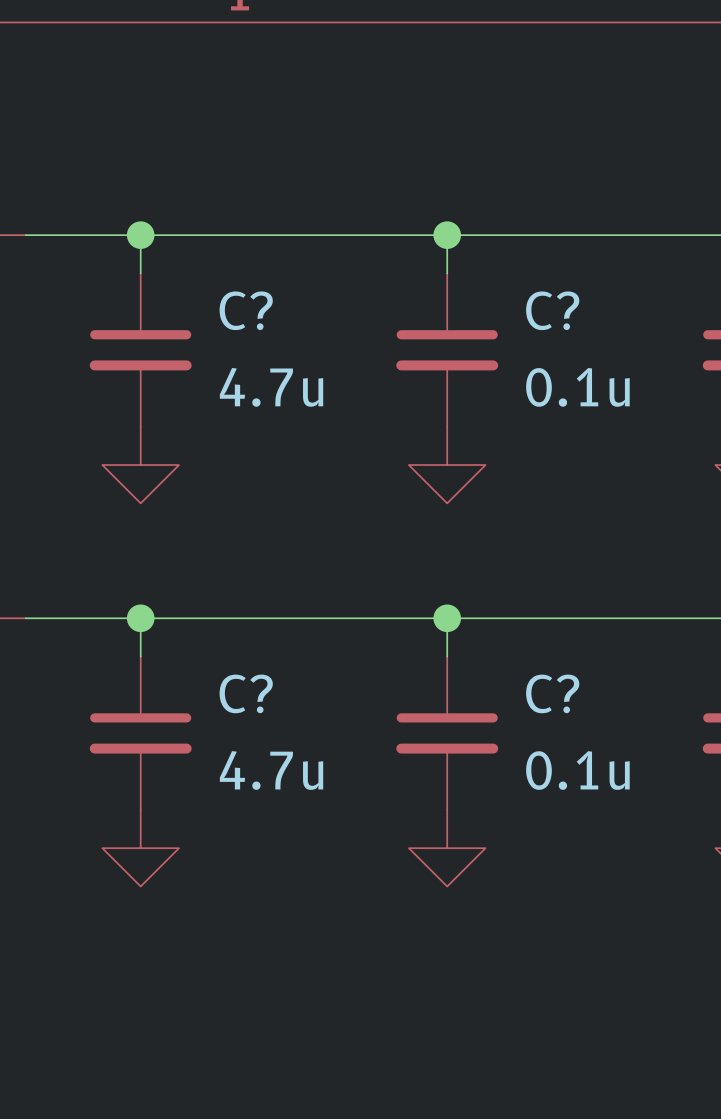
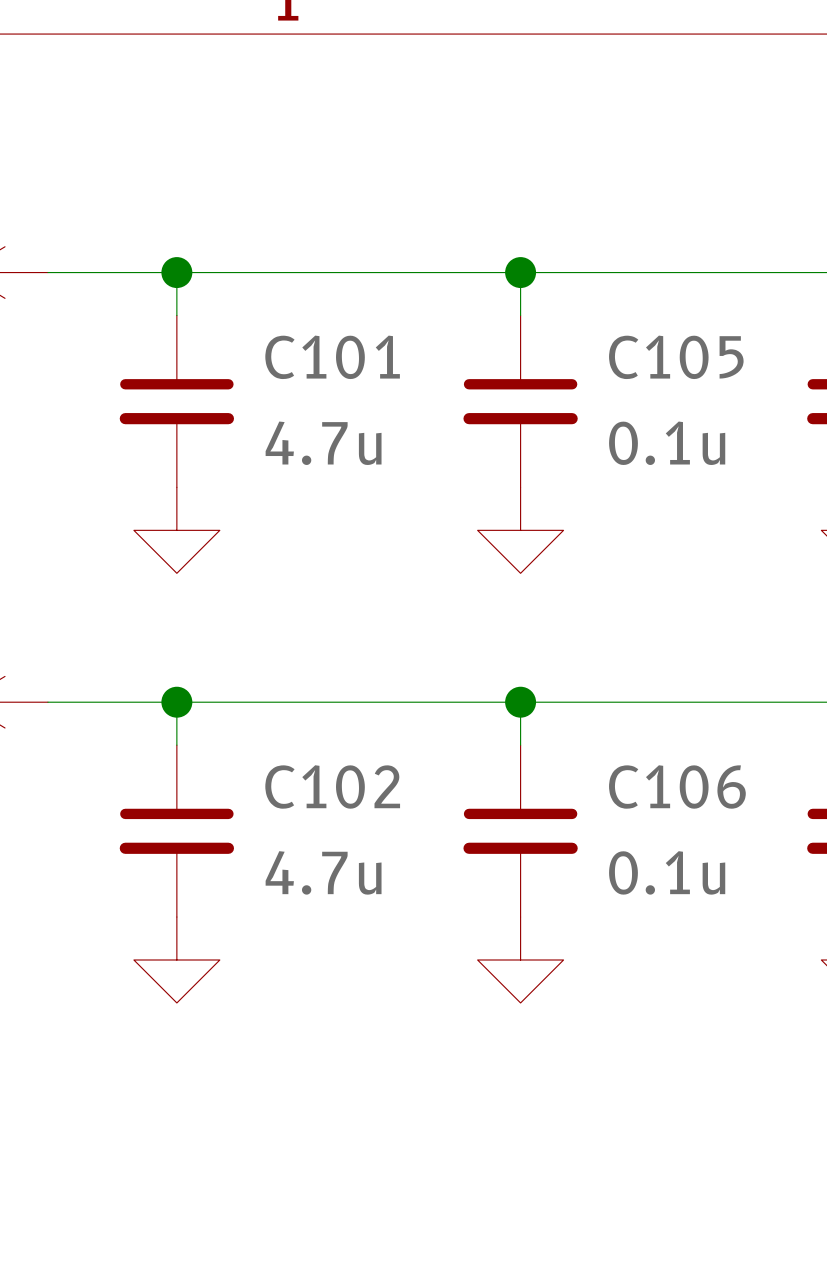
C? name: C? (246, 310) -> C101 (332, 357)
C? name: C? (552, 310) -> C105 (676, 357)
C? name: C? (246, 693) -> C102 (332, 786)
C? name: C? (552, 693) -> C106 (677, 786)

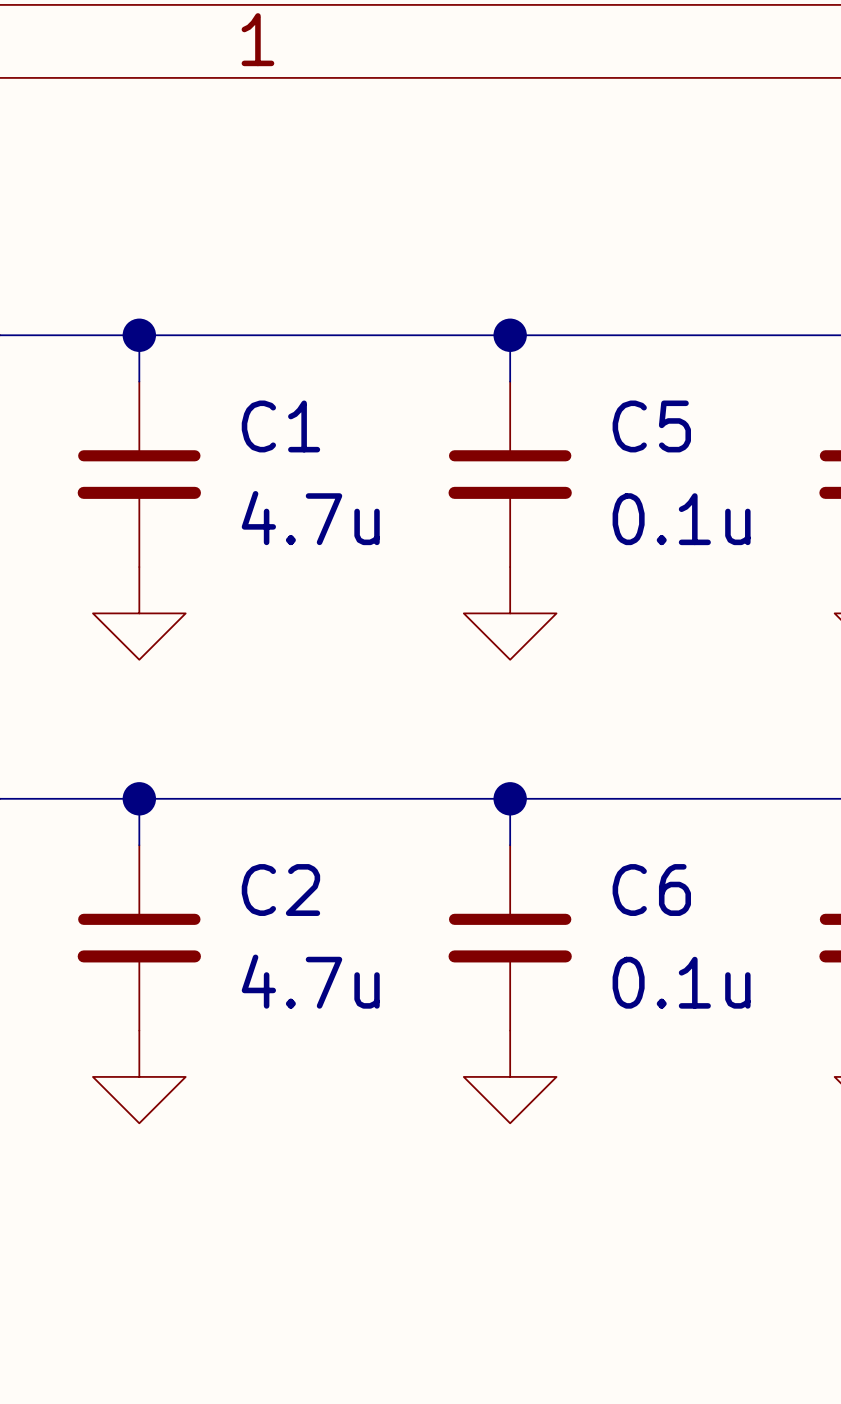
C101 name: C101 (332, 357) -> C1 (280, 426)
C105 name: C105 (676, 357) -> C5 (651, 426)
C102 name: C102 (332, 786) -> C2 (280, 890)
C106 name: C106 (677, 786) -> C6 (651, 890)

